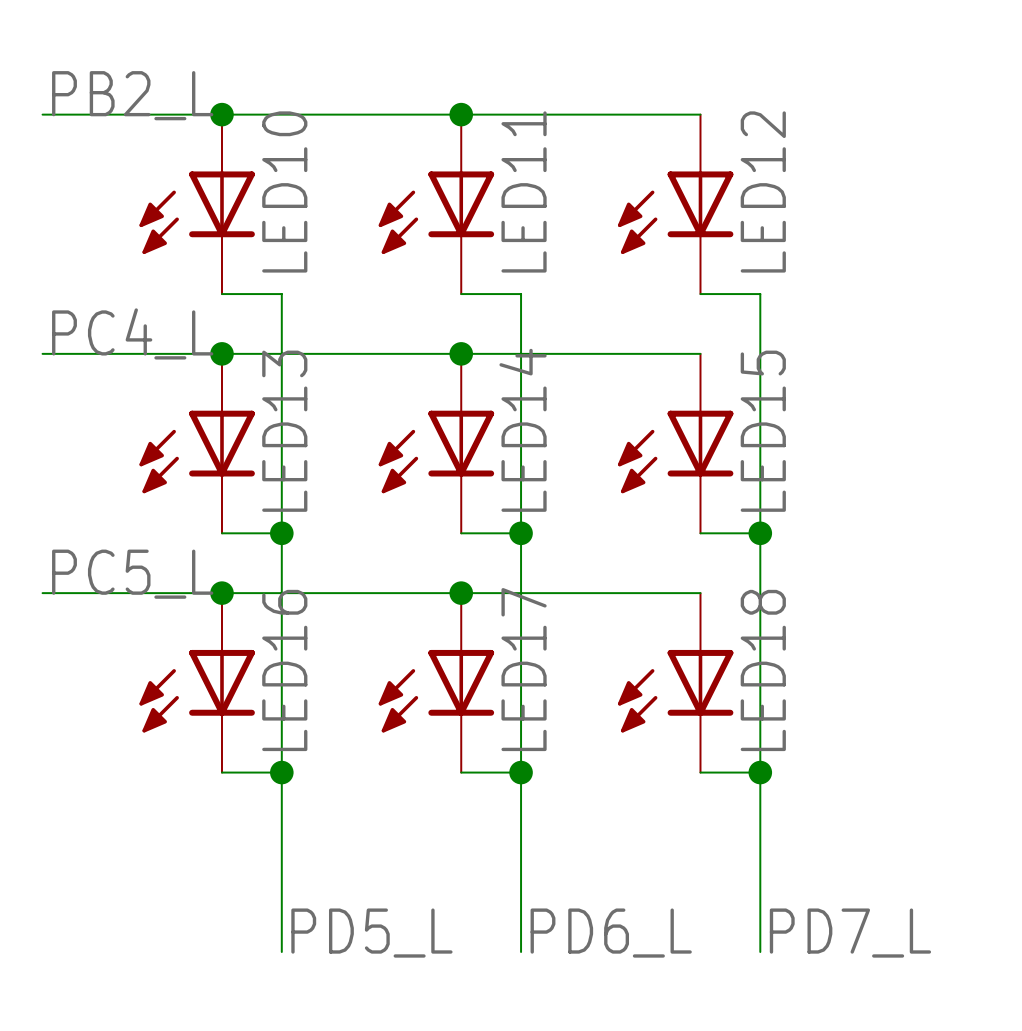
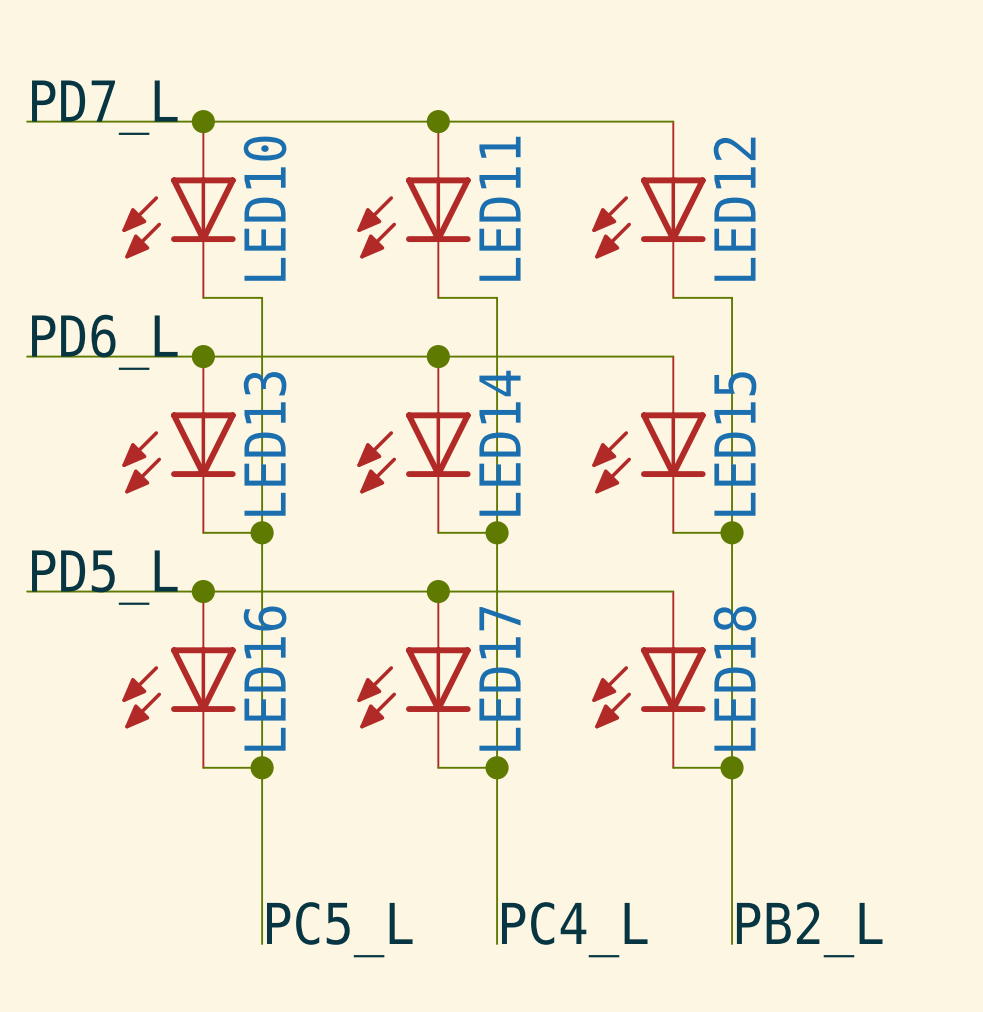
label: PB2_L (132, 95) -> PD7_L (104, 107)
label: PC4_L (132, 333) -> PD6_L (104, 342)
label: PC5_L (132, 574) -> PD5_L (104, 577)
label: PD5_L (371, 933) -> PC5_L (339, 929)
label: PD6_L (611, 933) -> PC4_L (574, 929)
label: PD7_L (850, 933) -> PB2_L (809, 929)

